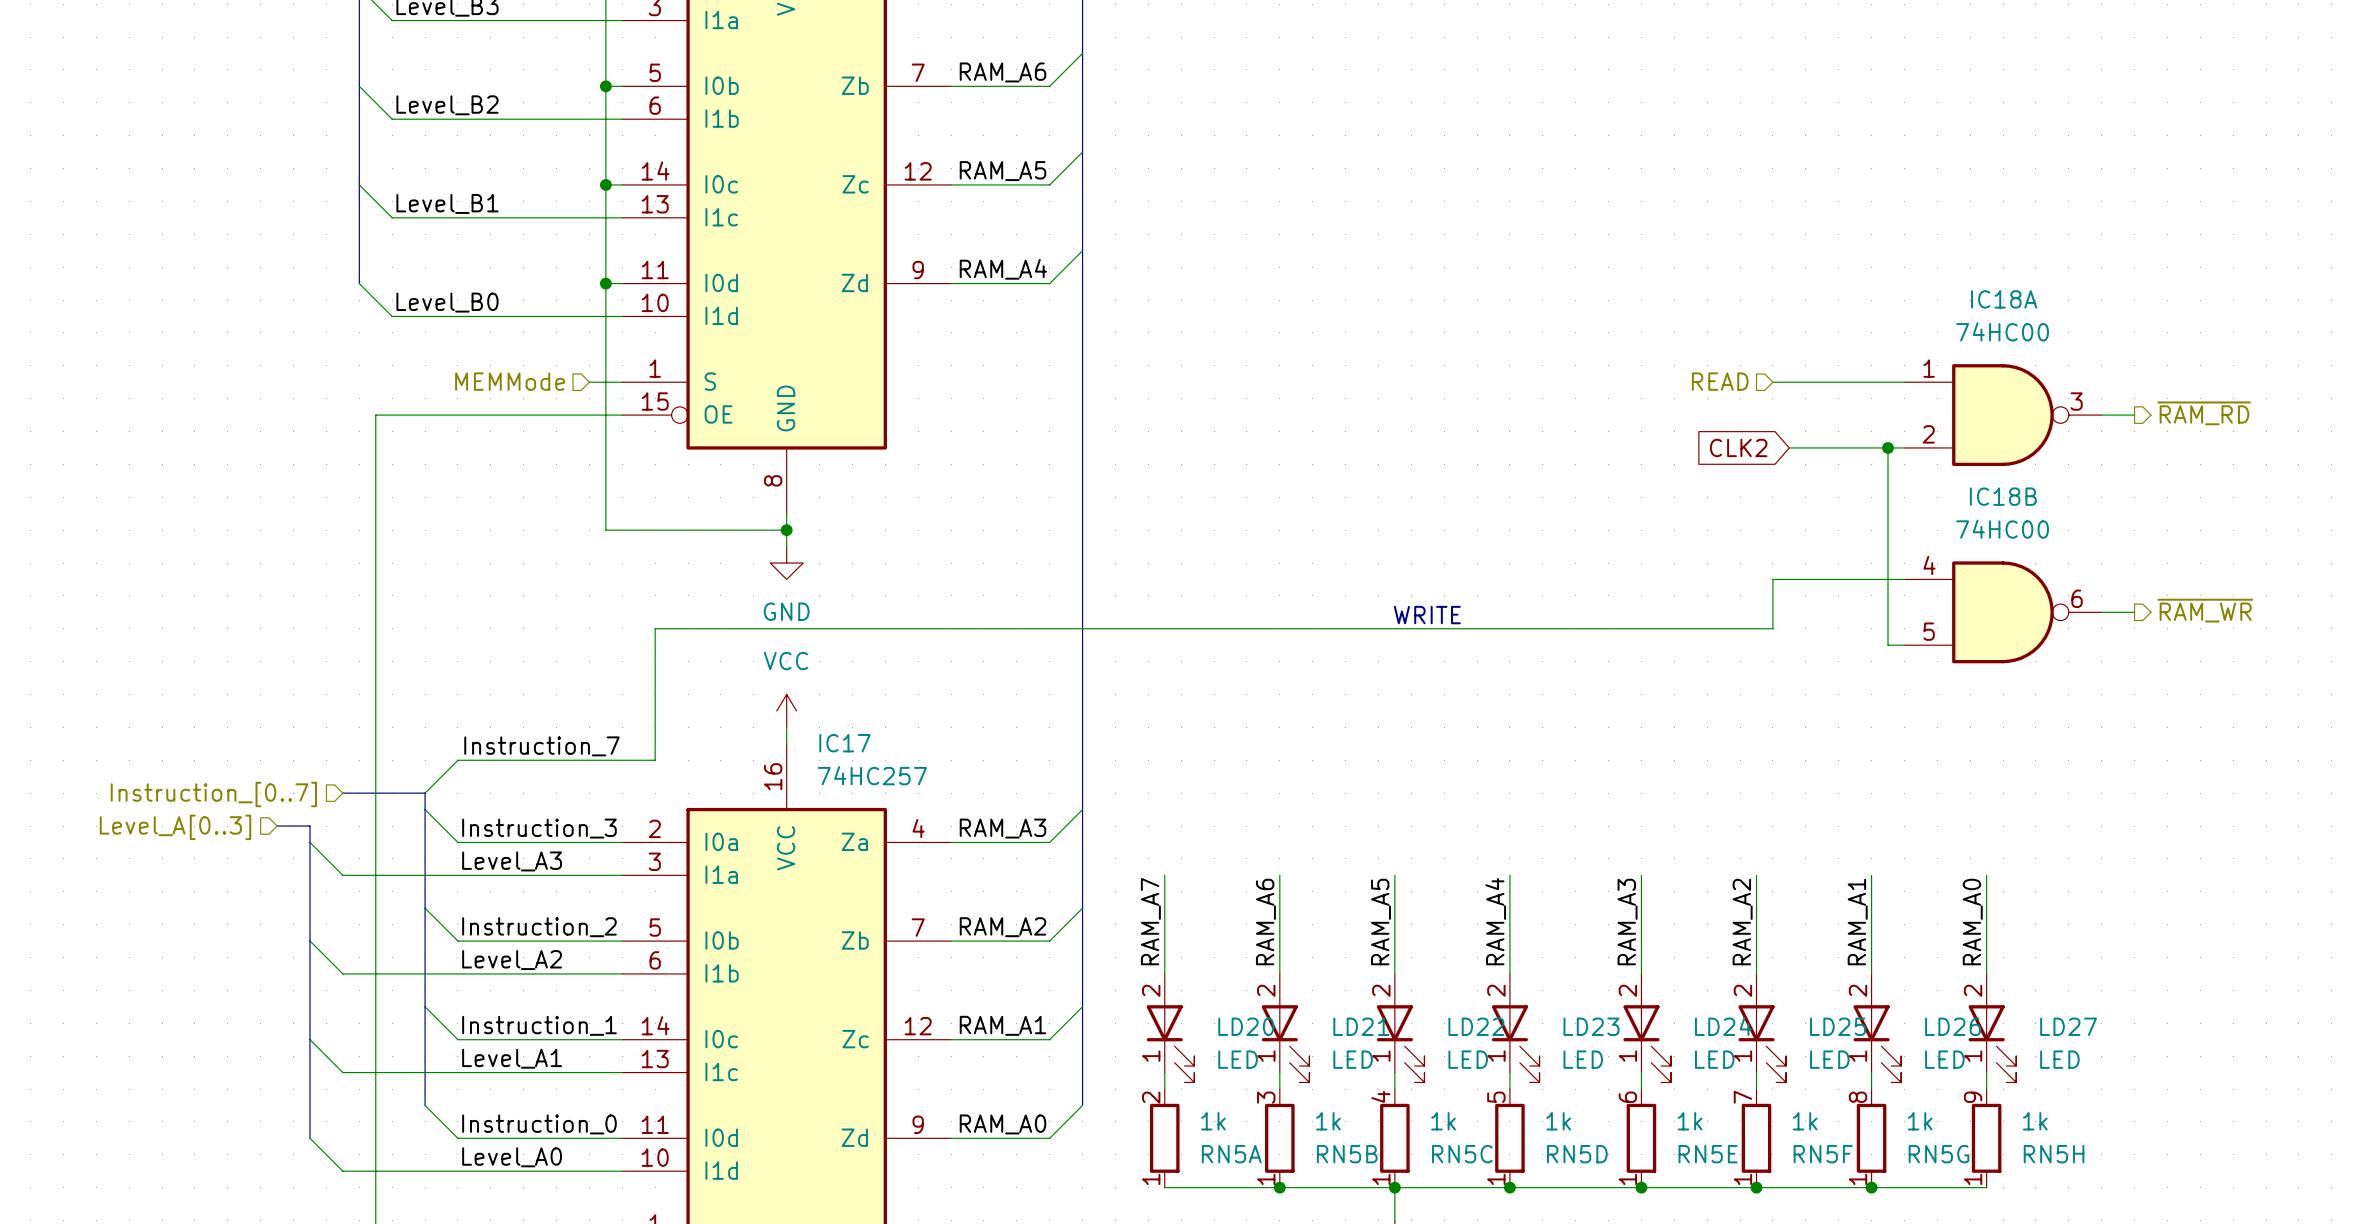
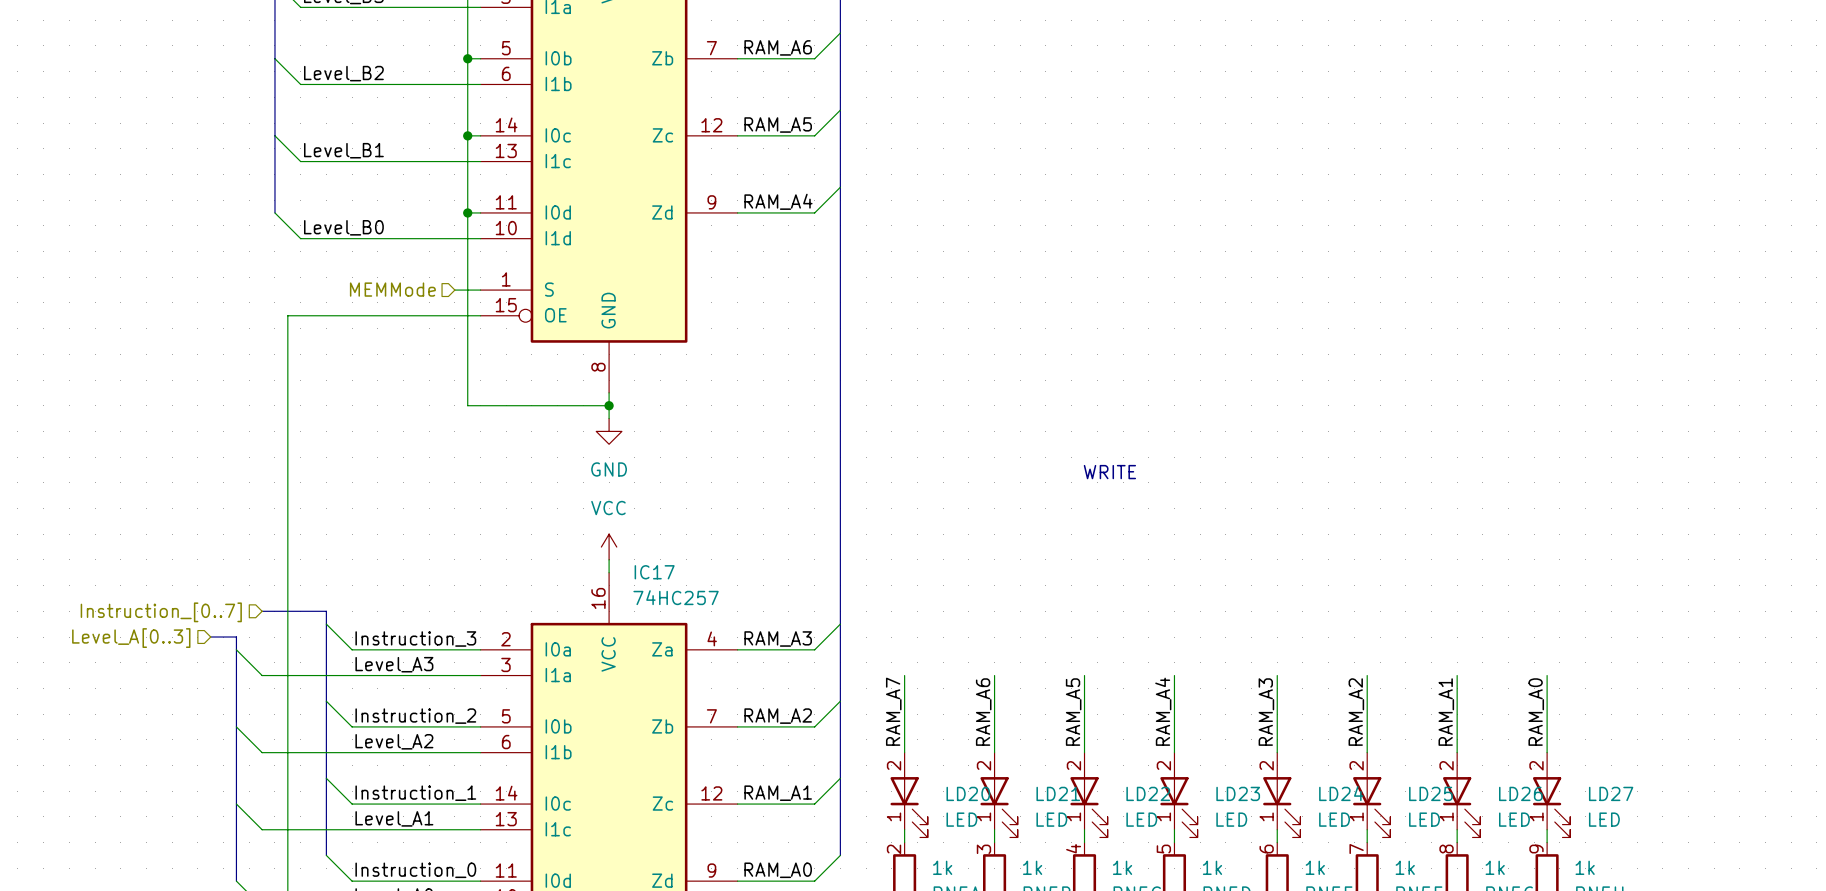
hierarchical label: READ (1720, 381) -> none
wire: (1772, 382) (1904, 382) -> none
hierarchical label: ~{RAM_RD} (2204, 413) -> none
IC18A: 74HC00 (2003, 415) -> none
wire: (2101, 415) (2134, 415) -> none
global label: CLK2 (1738, 447) -> none
wire: (1789, 447) (1904, 447) -> none
wire: (1888, 447) (1888, 645) (1904, 645) -> none
junction: (1888, 447) -> none
wire: (1904, 579) (1772, 579) (1772, 628) (655, 628) (655, 760) (457, 760) (425, 793) -> none
hierarchical label: ~{RAM_WR} (2205, 610) -> none
IC18B: 74HC00 (2003, 612) -> none
wire: (2101, 612) (2134, 612) -> none
label: Instruction_7 (541, 746) -> none

